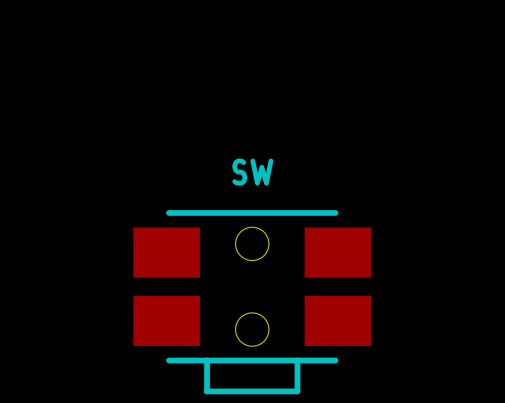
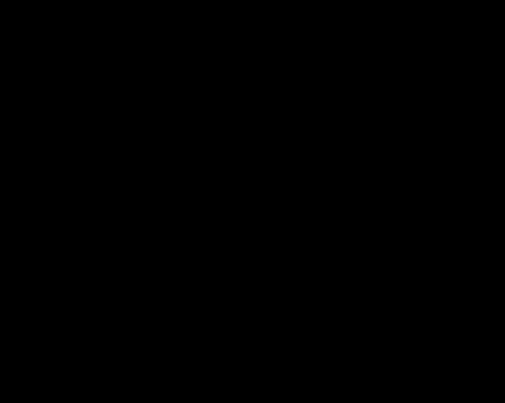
sw: (252, 302) -> none

